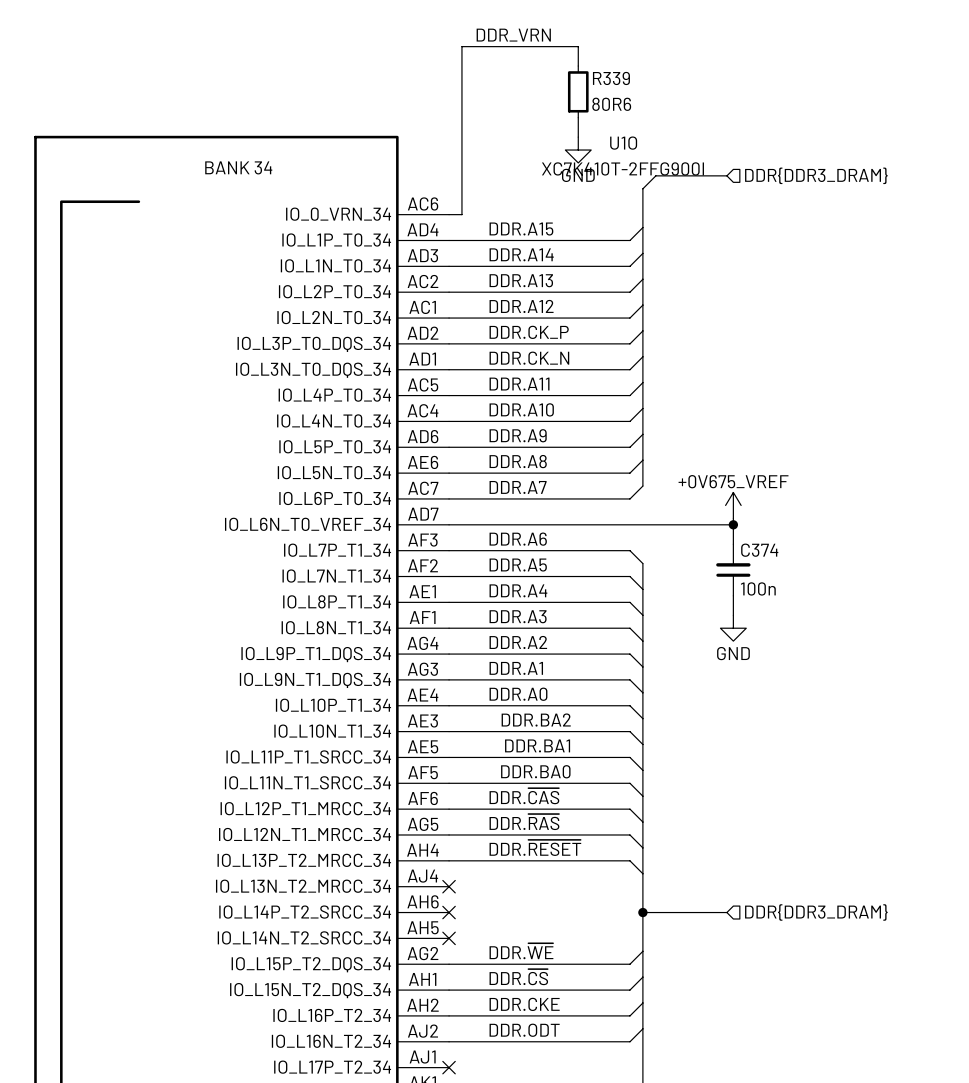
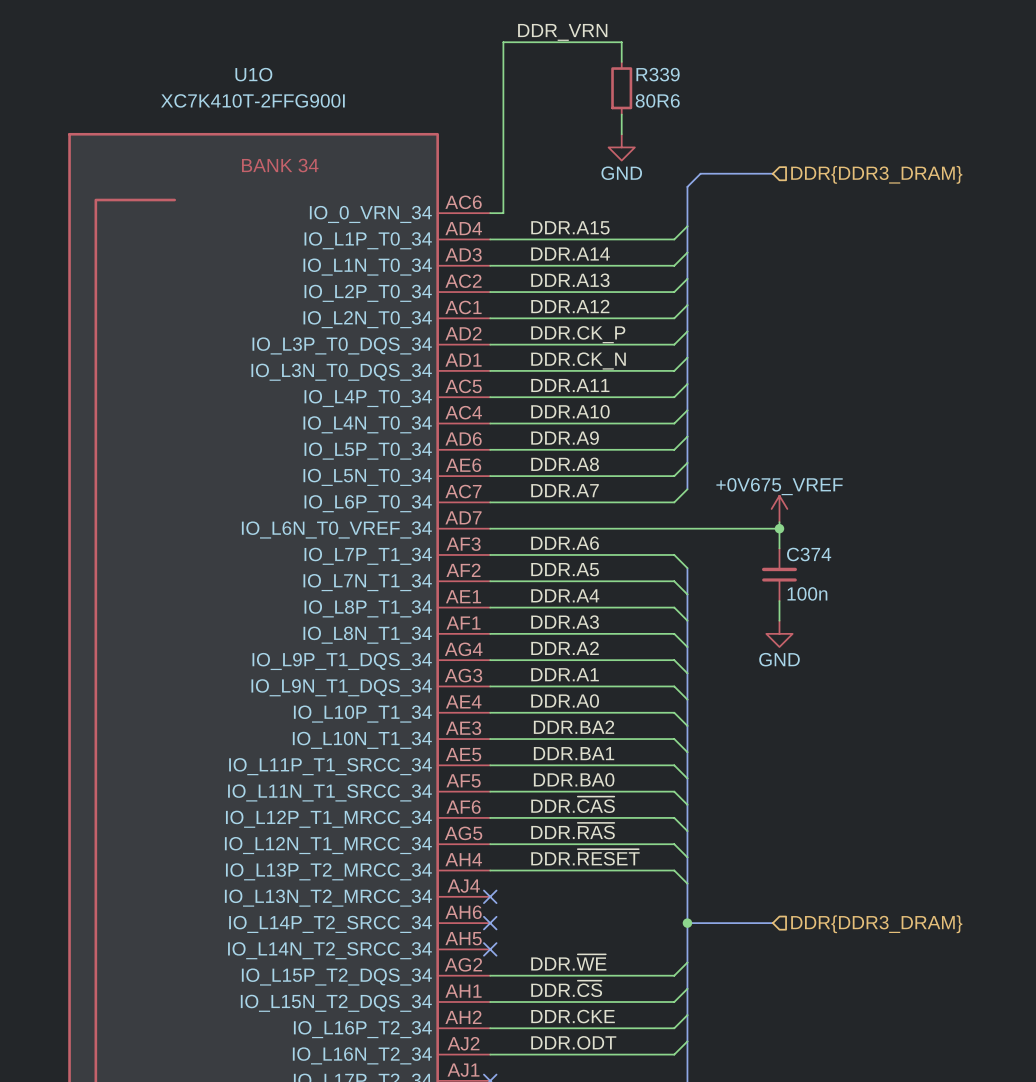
U1O name position: U1O (623, 143) -> U1O (253, 74)
U1O value position: XC7K410T-2FFG900I (622, 168) -> XC7K410T-2FFG900I (252, 100)

